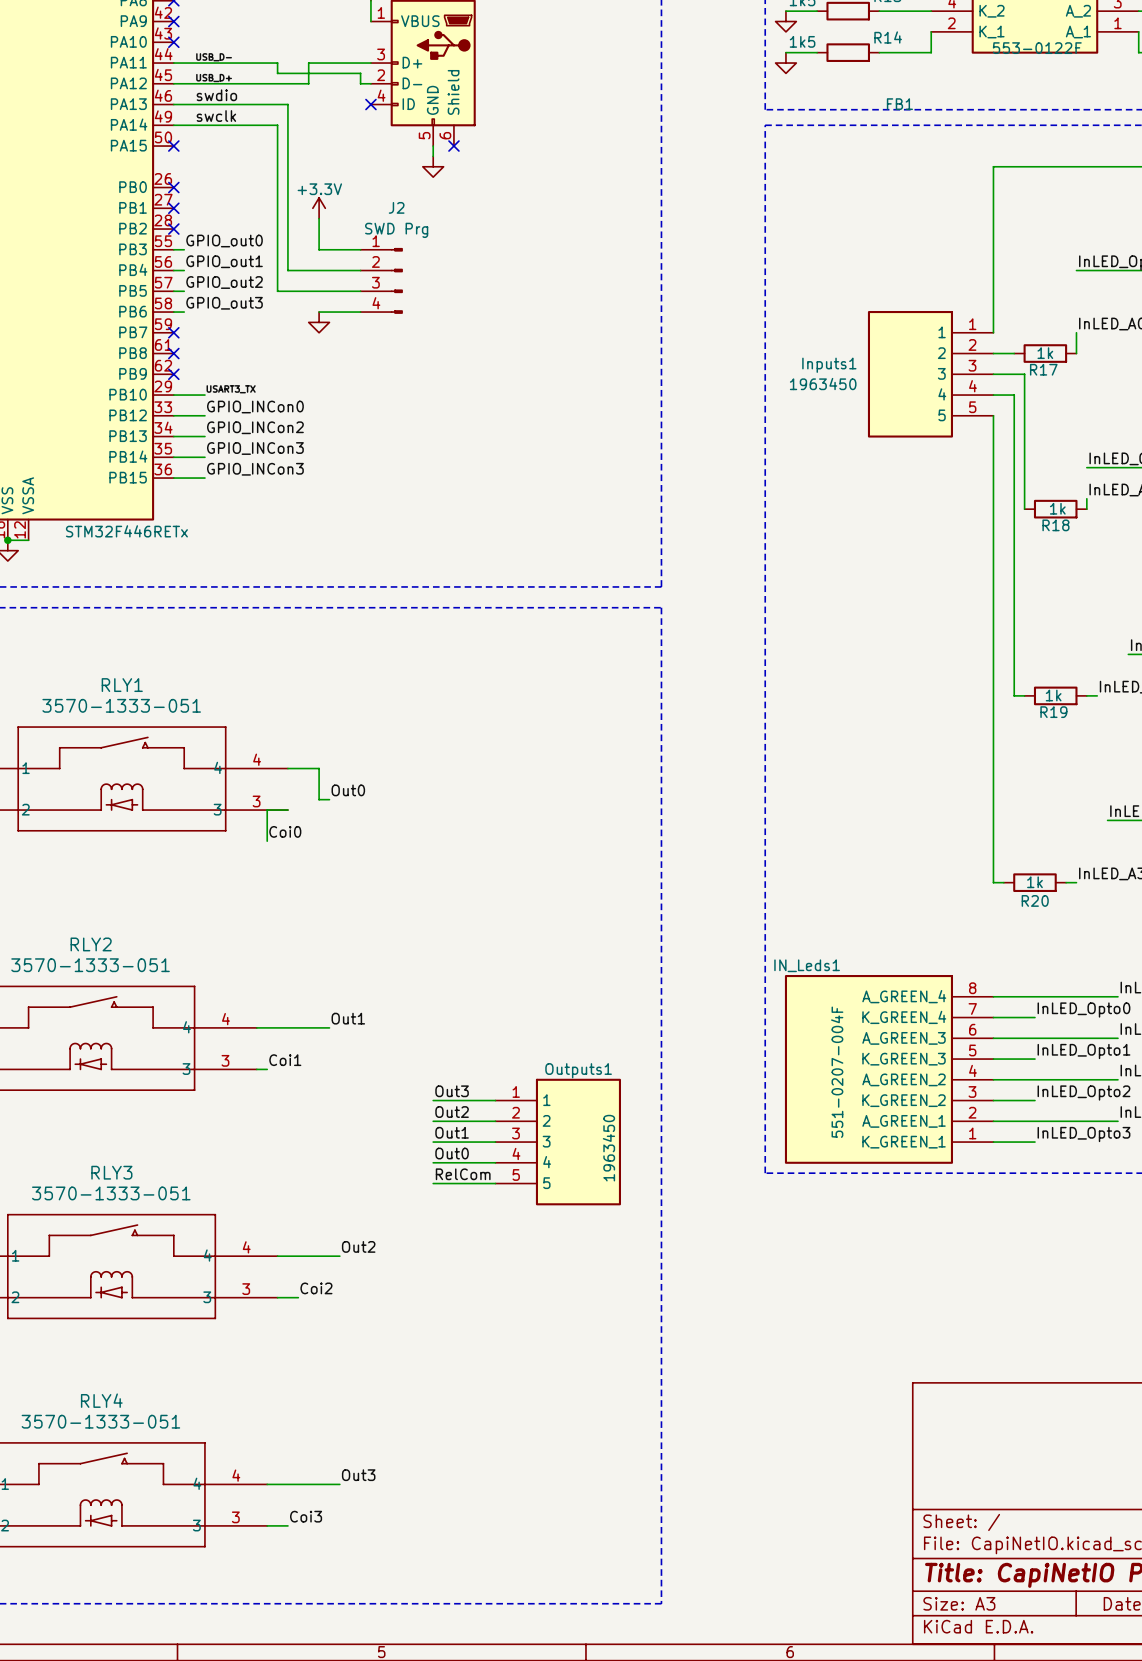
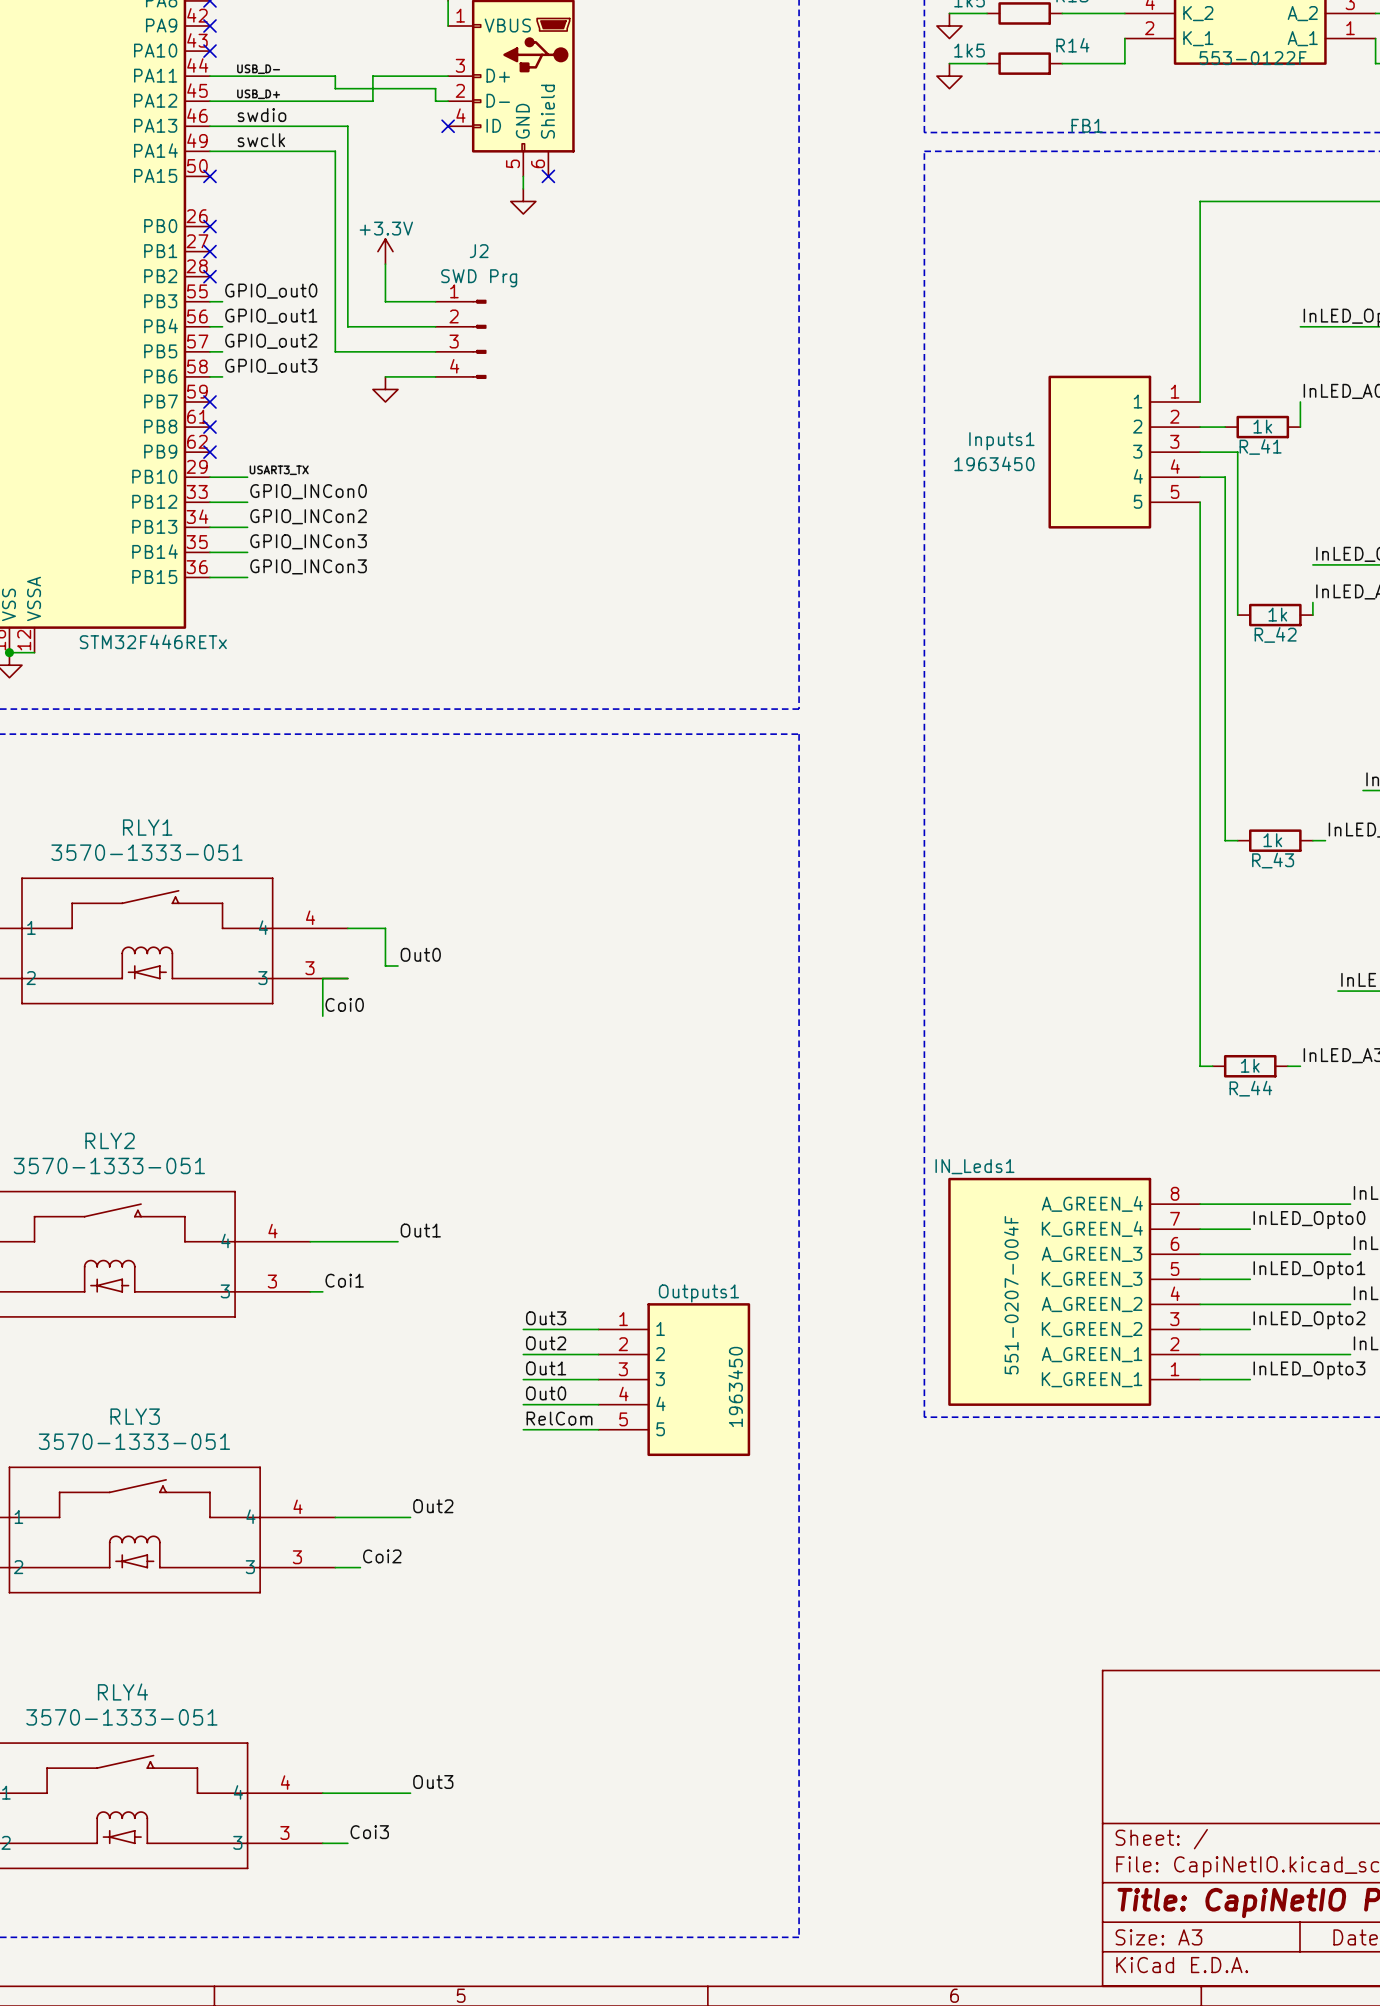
R17 name: R17 (1043, 369) -> R_41 (1260, 446)
R18 name: R18 (1055, 525) -> R_42 (1275, 634)
R19 name: R19 (1053, 712) -> R_43 (1273, 860)
R20 name: R20 (1035, 900) -> R_44 (1250, 1088)

